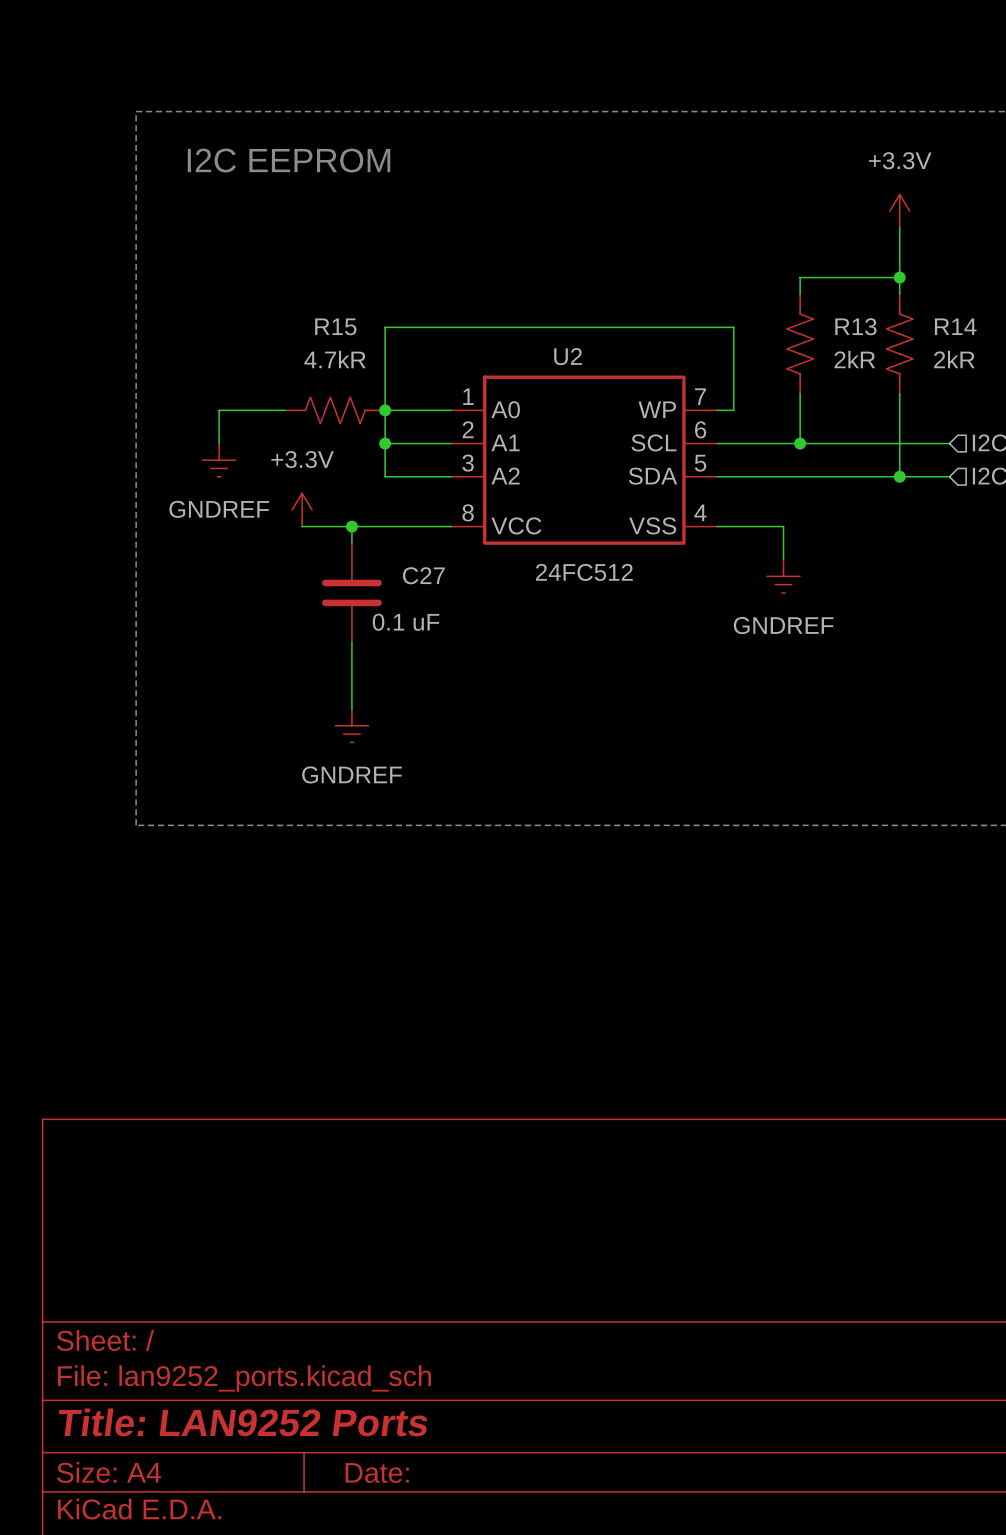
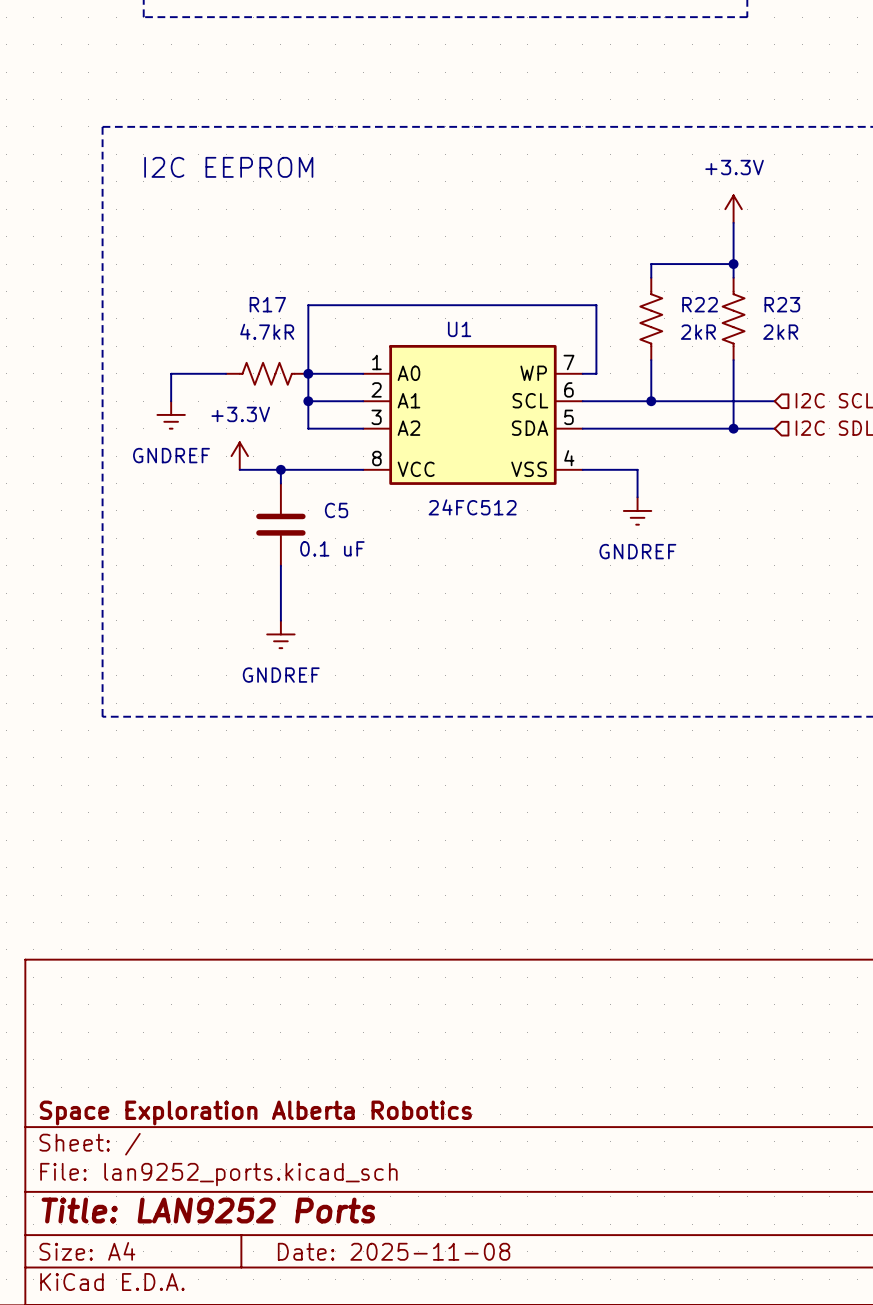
R15 name: R15 (335, 326) -> R17 (267, 304)
R13 name: R13 (855, 326) -> R22 (700, 304)
R14 name: R14 (955, 326) -> R23 (782, 304)
U2 name: U2 (568, 356) -> U1 (459, 329)
C27 name: C27 (423, 575) -> C5 (336, 510)
title block: none -> Space Exploration Alberta Robotics (255, 1112)
title block: Date: (377, 1472) -> Date: 2025-11-08 (394, 1251)

